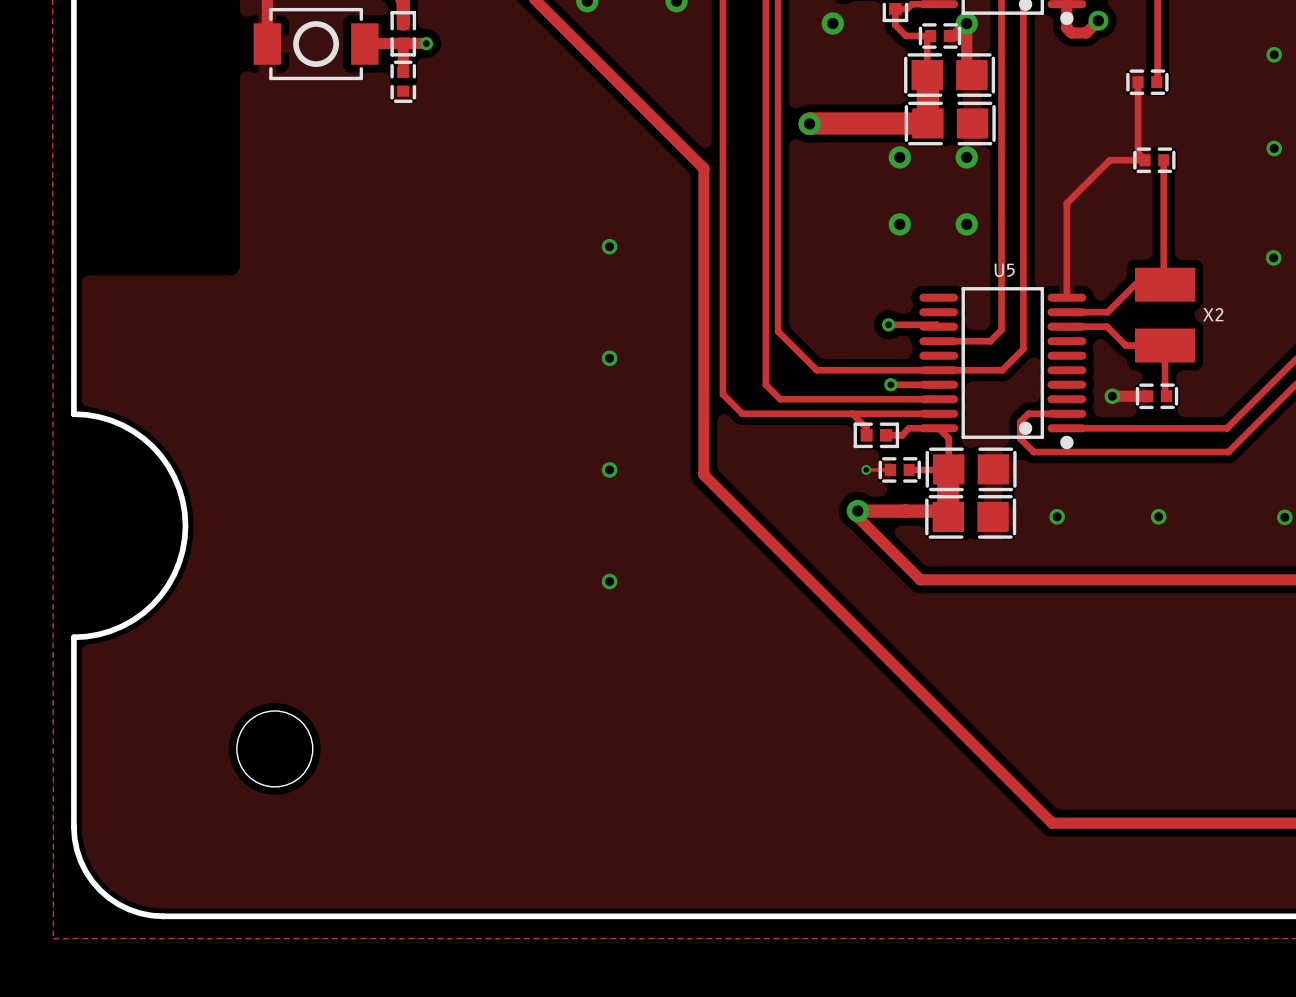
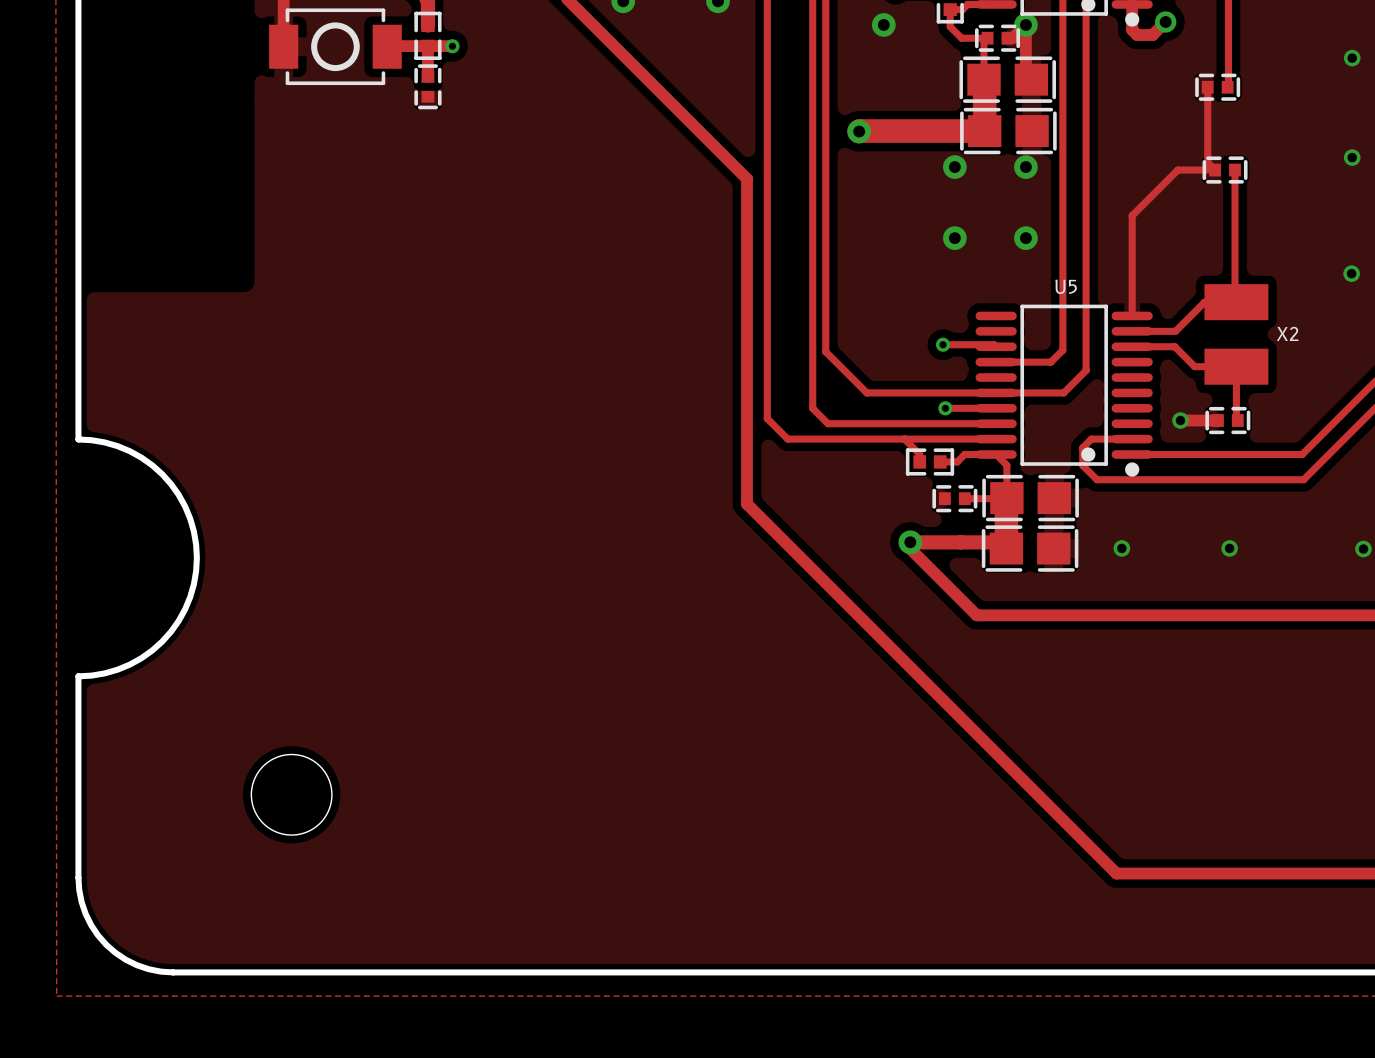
via: (609, 246) -> none
via: (609, 358) -> none
via: (609, 469) -> none
track: (866, 469) (890, 469) -> none
via: (866, 469) -> none
via: (609, 581) -> none

